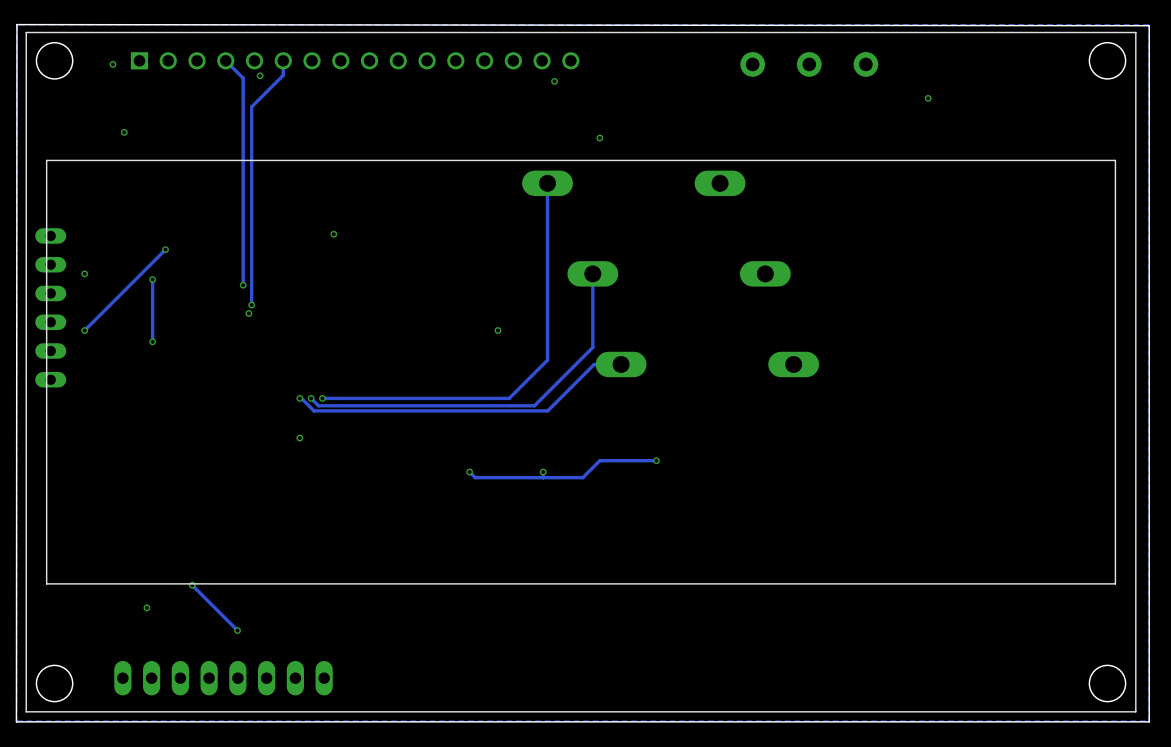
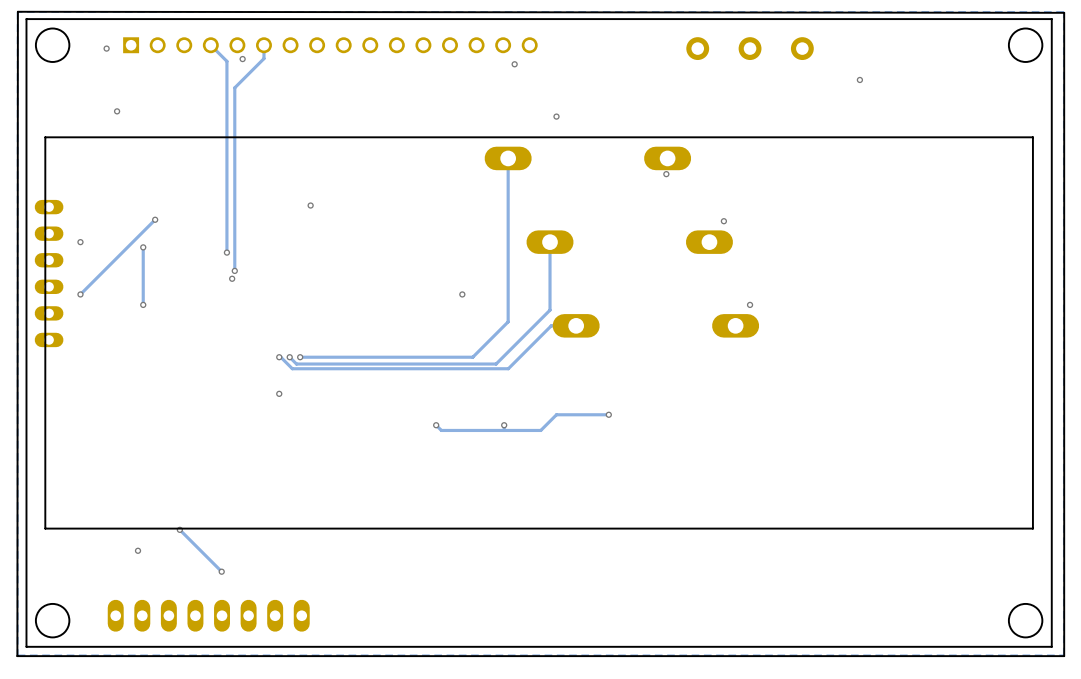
via: none -> (666, 174)
via: none -> (723, 221)
via: none -> (750, 304)

